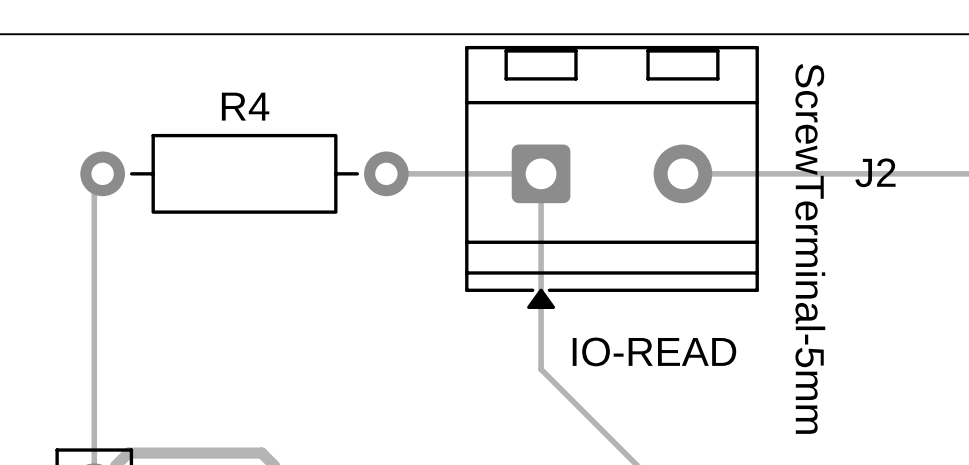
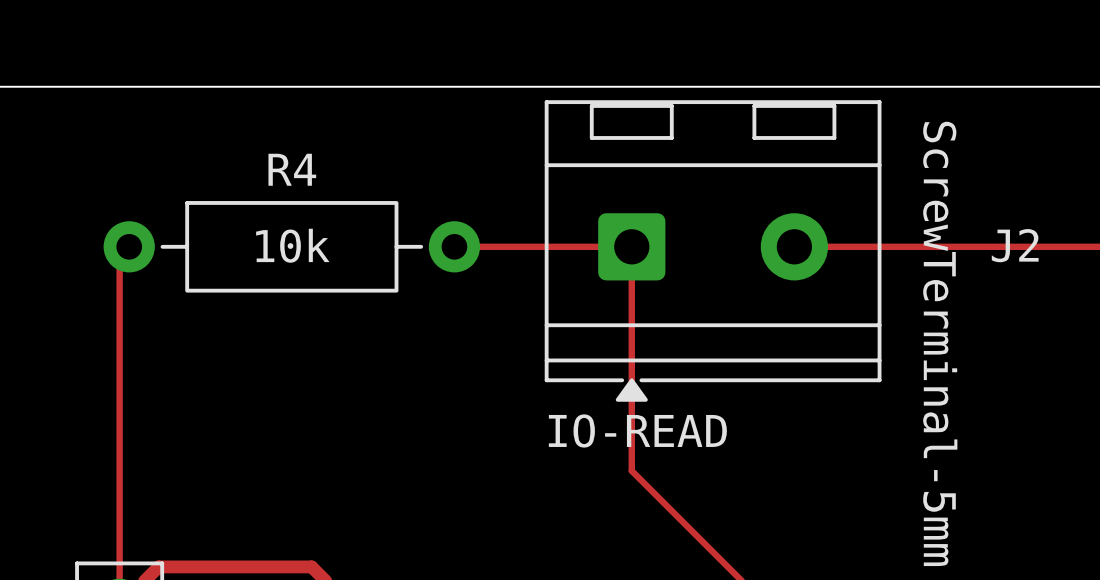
text: none -> 10k (292, 245)
text position: IO-READ (654, 351) -> IO-READ (637, 430)

